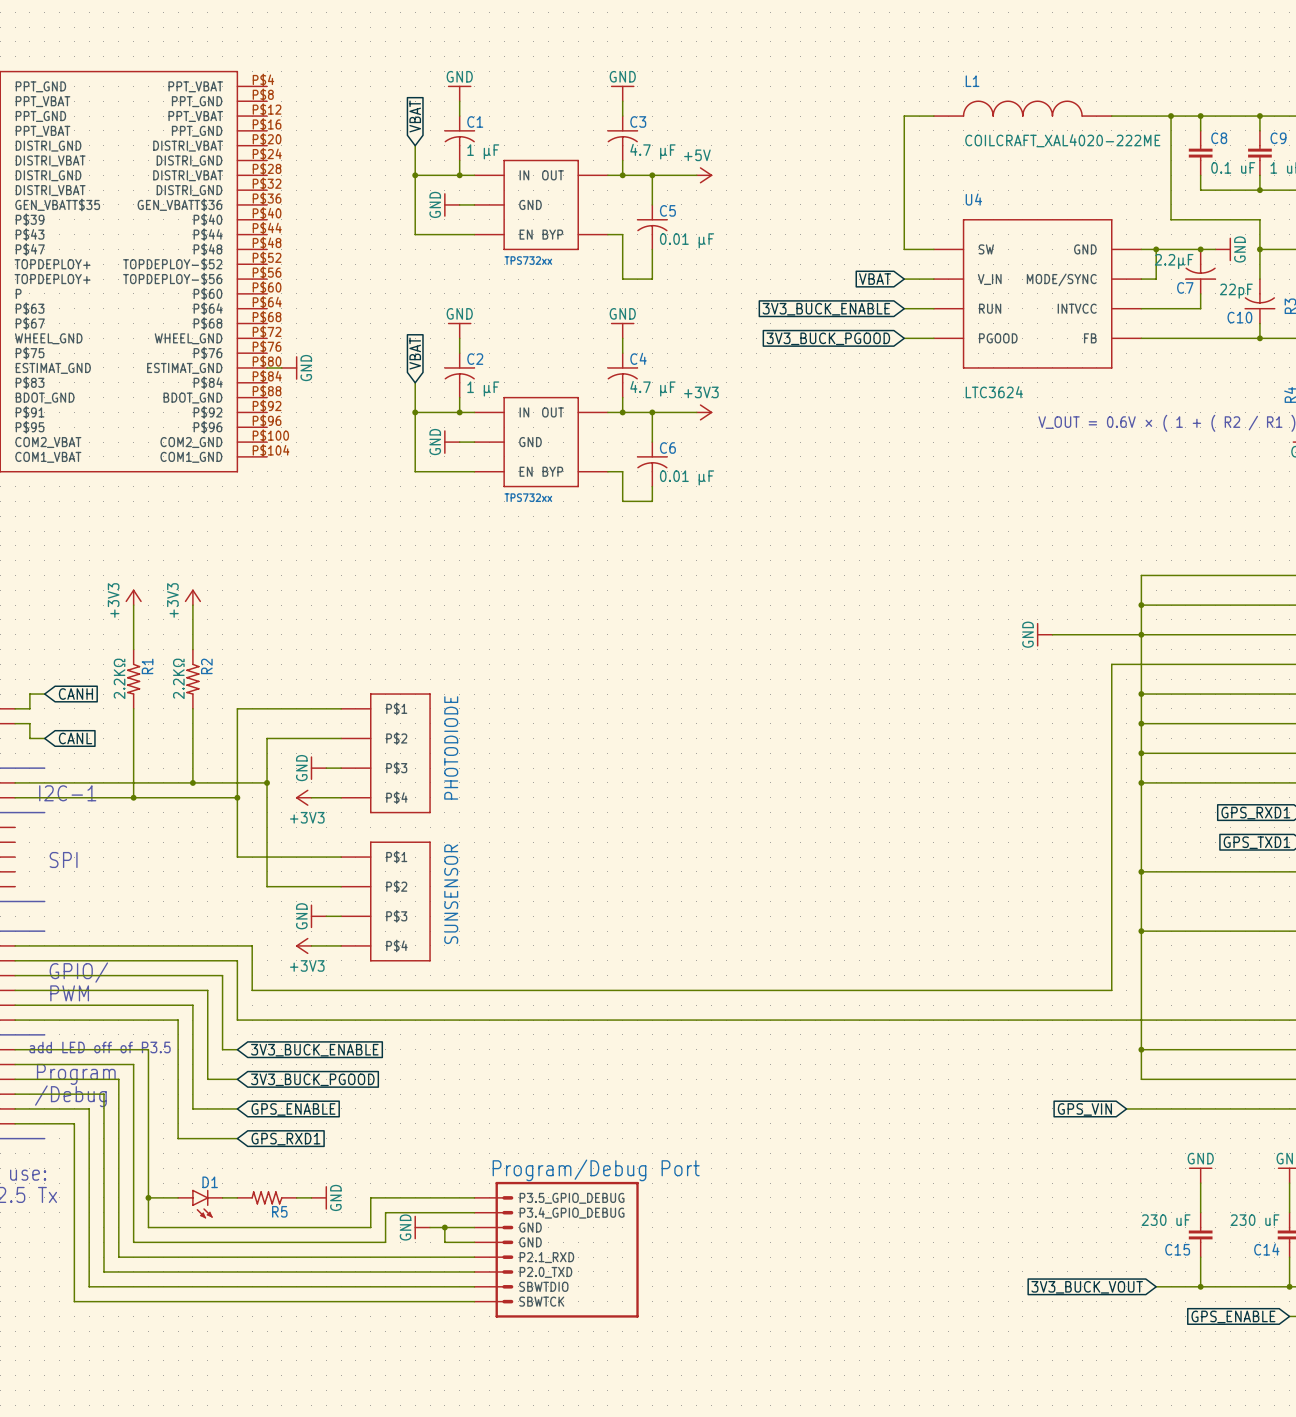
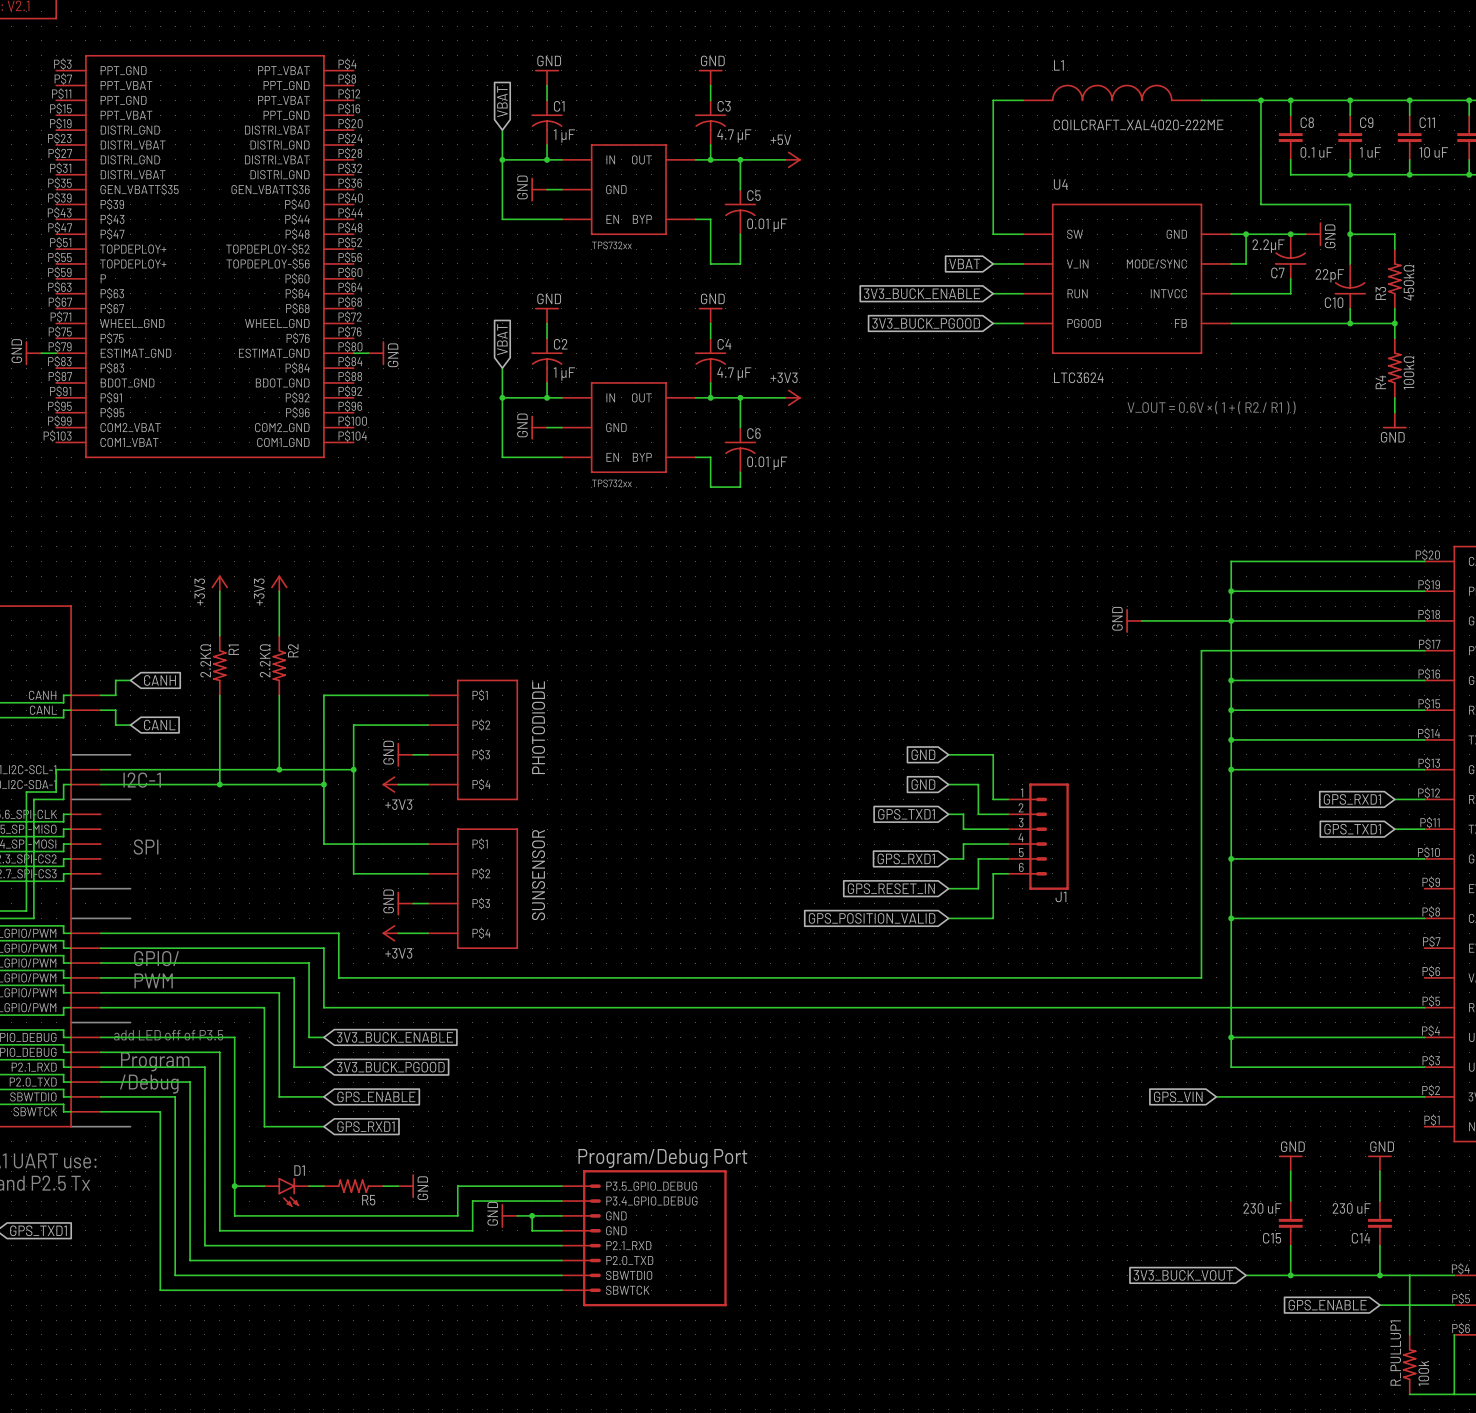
global label: none -> GND (923, 754)
wire: none -> (948, 754) (993, 754) (993, 799) (1008, 799)
global label: none -> GND (923, 784)
wire: none -> (948, 784) (978, 784) (978, 814) (1008, 814)
global label: none -> GPS_TXD1 (906, 814)
wire: none -> (948, 814) (963, 814) (963, 829) (1008, 829)
J1: none -> (1038, 836)
wire: none -> (1008, 844) (963, 844) (963, 858) (948, 858)
wire: none -> (1008, 858) (978, 858) (978, 888) (948, 888)
global label: none -> GPS_RXD1 (906, 858)
wire: none -> (1008, 873) (993, 873) (993, 918) (948, 918)
global label: none -> GPS_RESET_IN (891, 888)
global label: none -> GPS_POSITION_VALID (872, 918)

